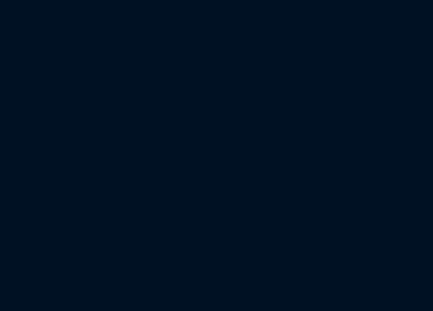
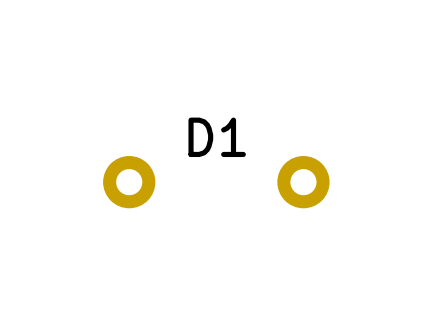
D1: none -> (216, 182)

